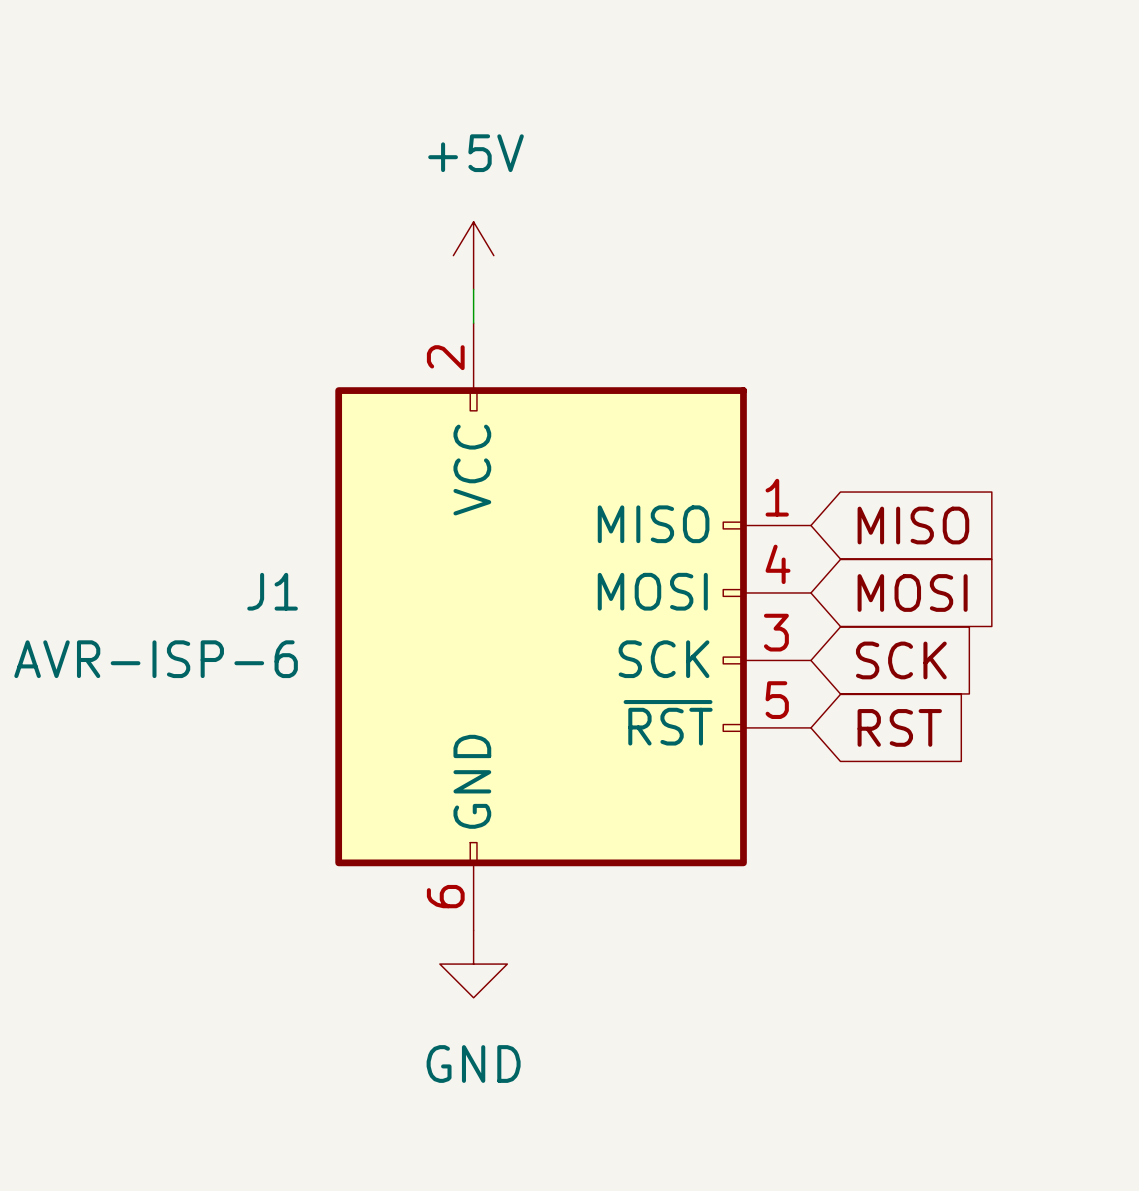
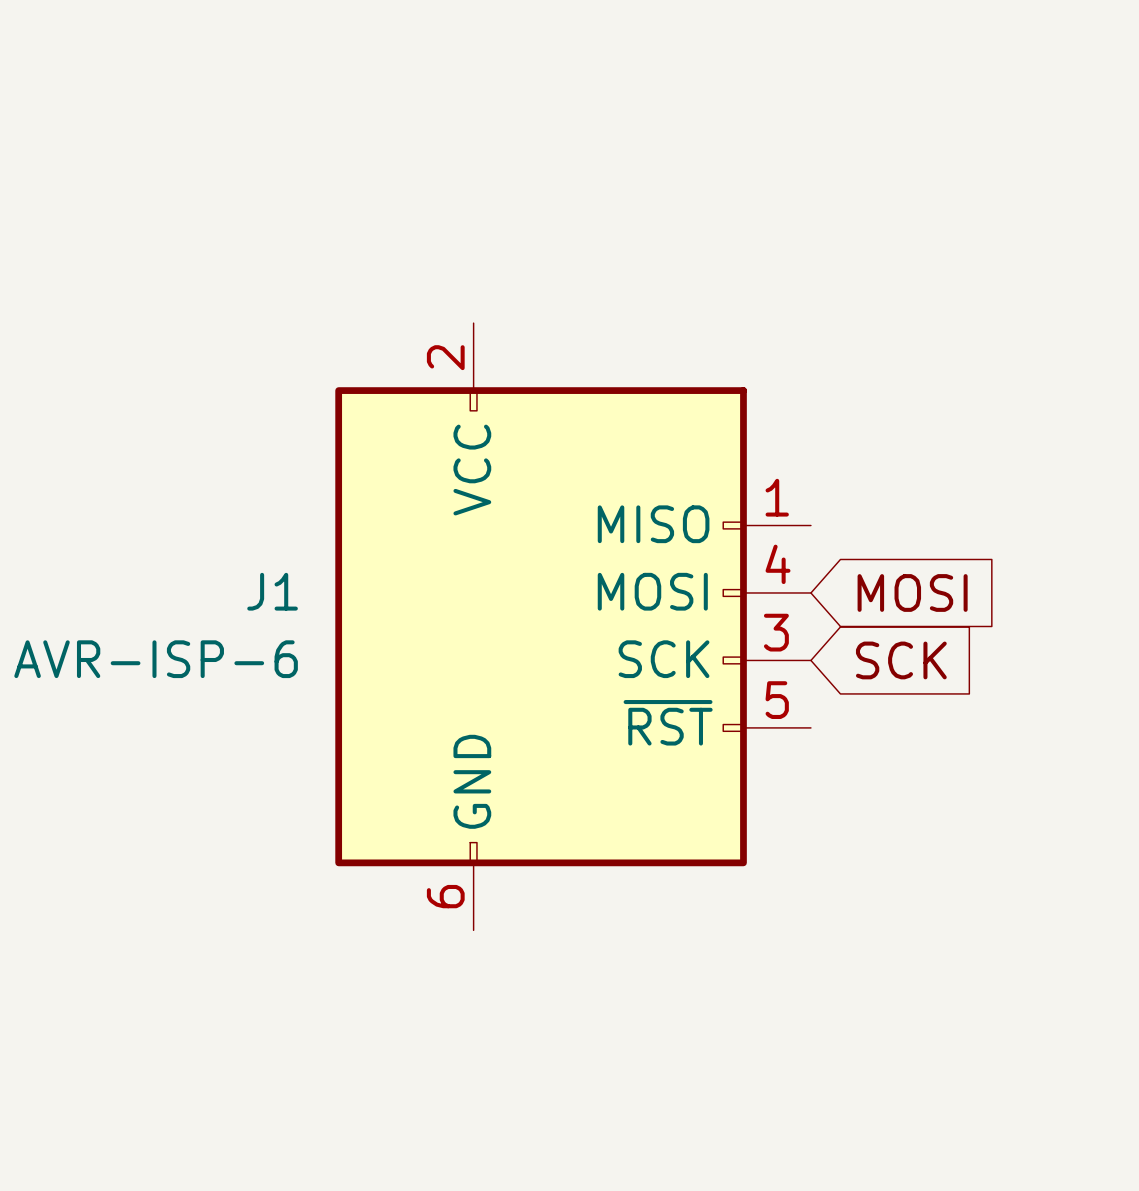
power symbol: +5V (473, 255) -> none
wire: (473, 289) (473, 323) -> none
global label: MISO (913, 525) -> none
global label: RST (899, 727) -> none
power symbol: GND (473, 964) -> none

